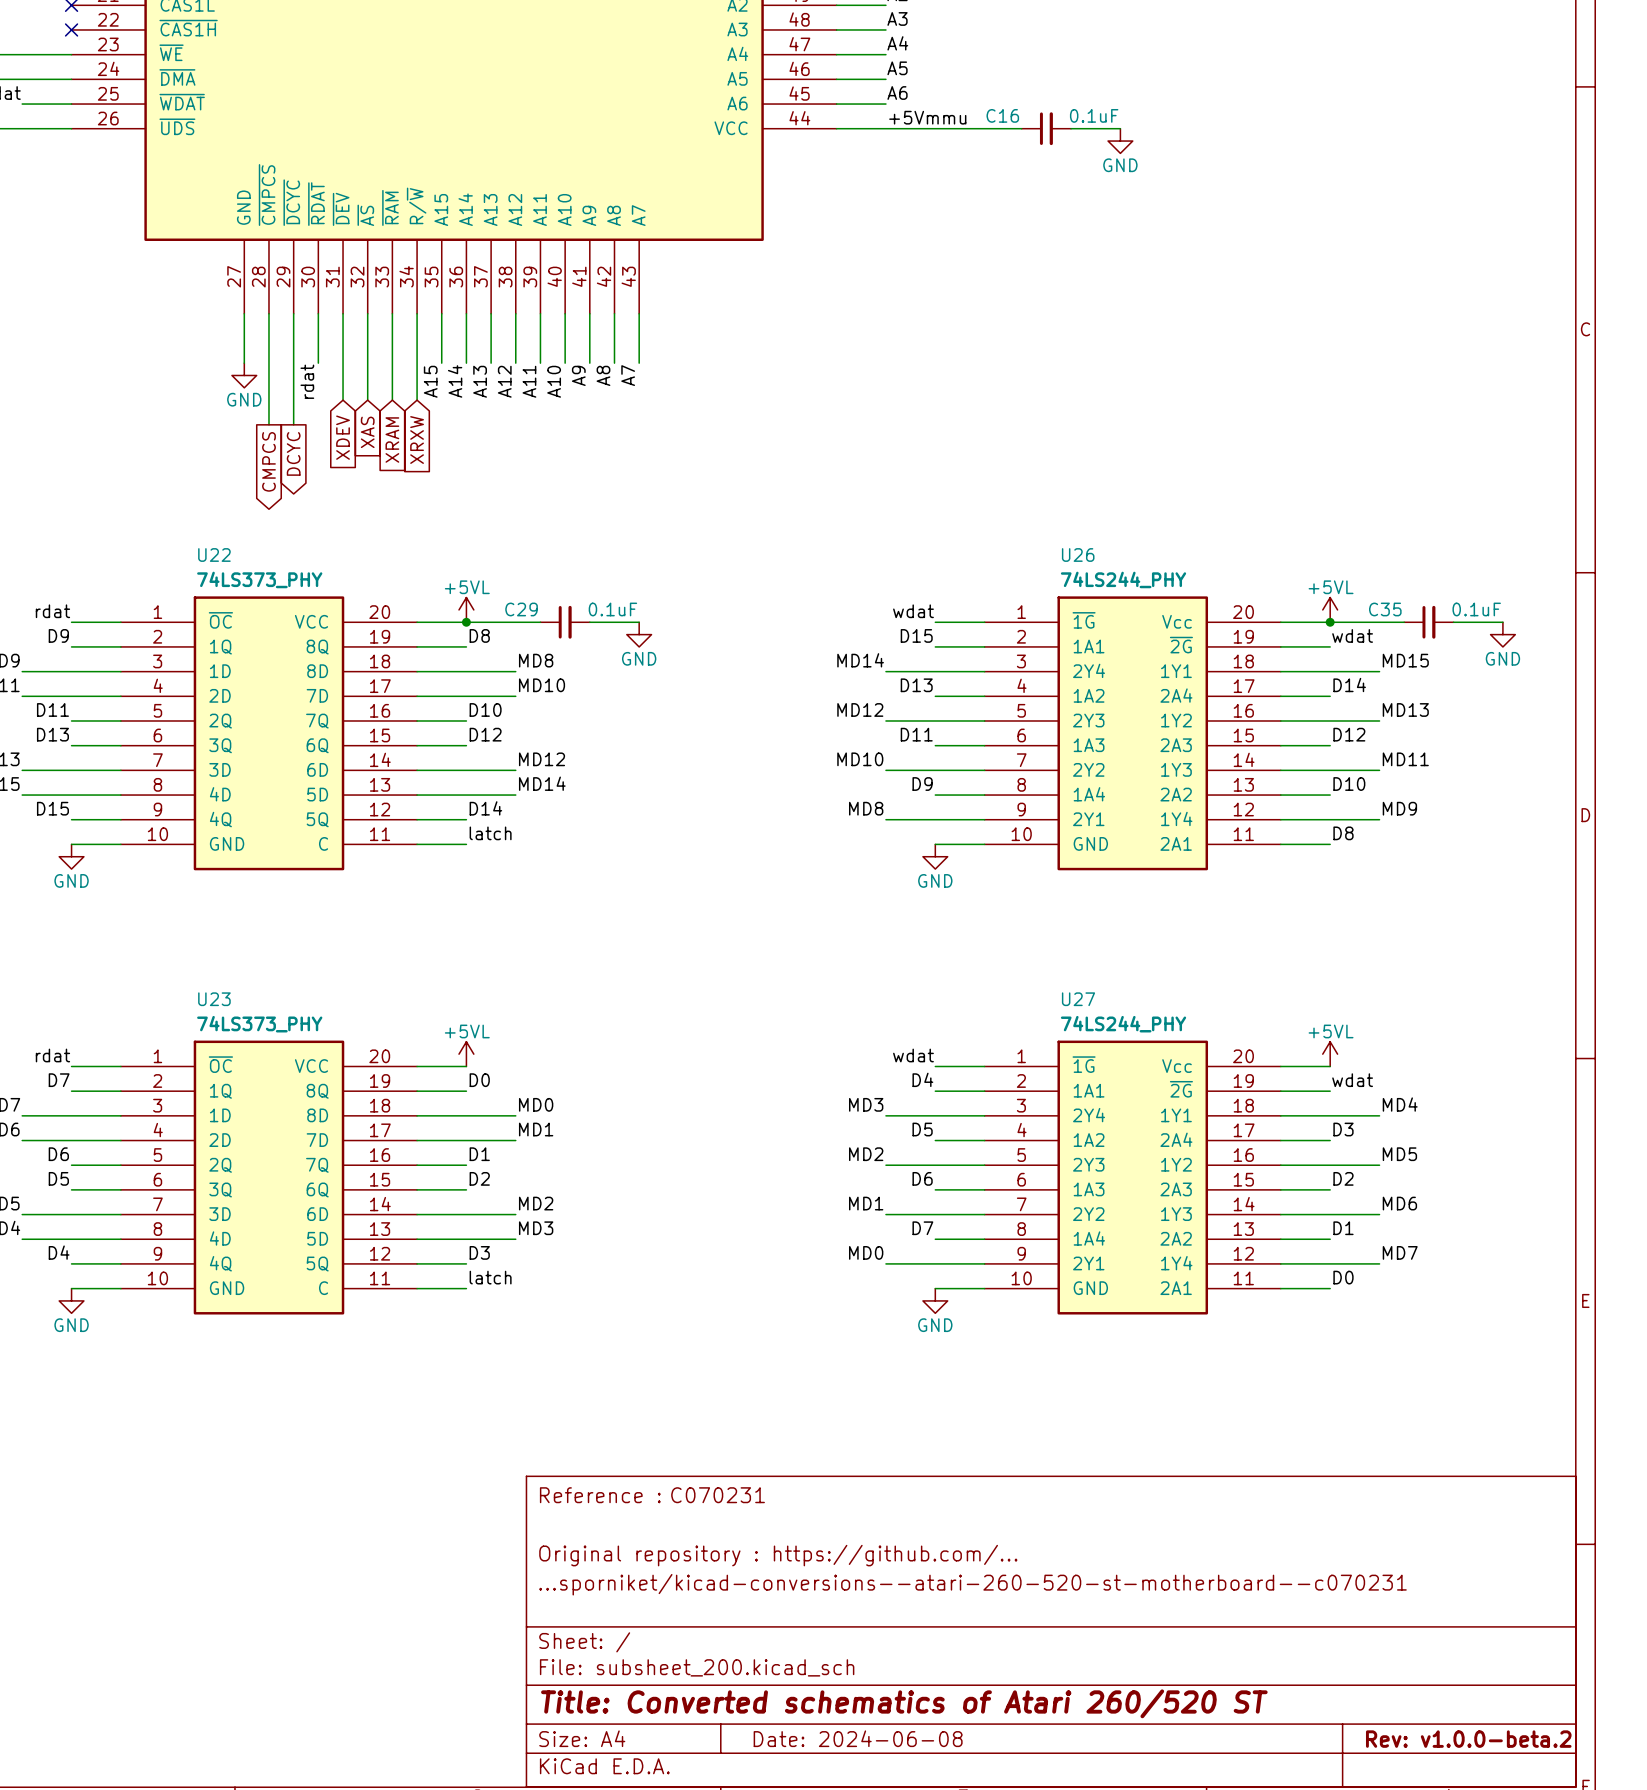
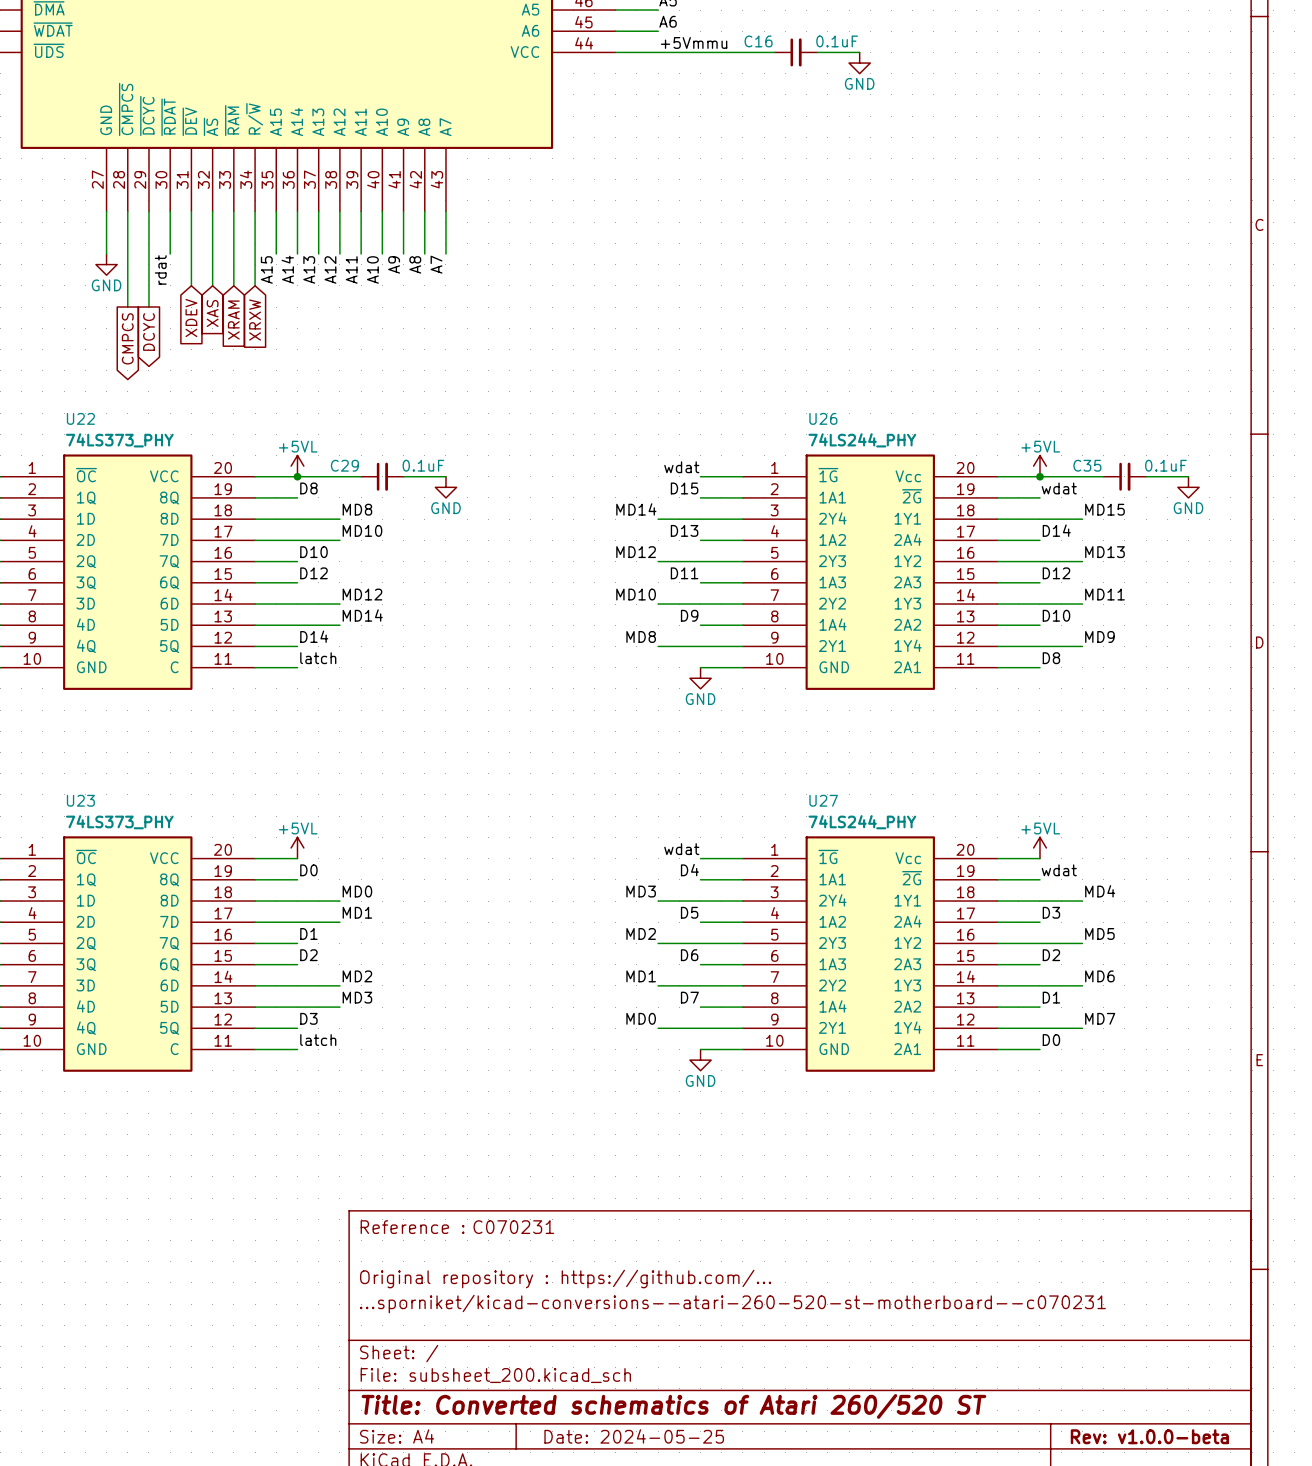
title block: Date: 2024-06-08 (858, 1738) -> Date: 2024-05-25 (634, 1436)
title block: Rev: v1.0.0-beta.2 (1468, 1739) -> Rev: v1.0.0-beta (1149, 1436)

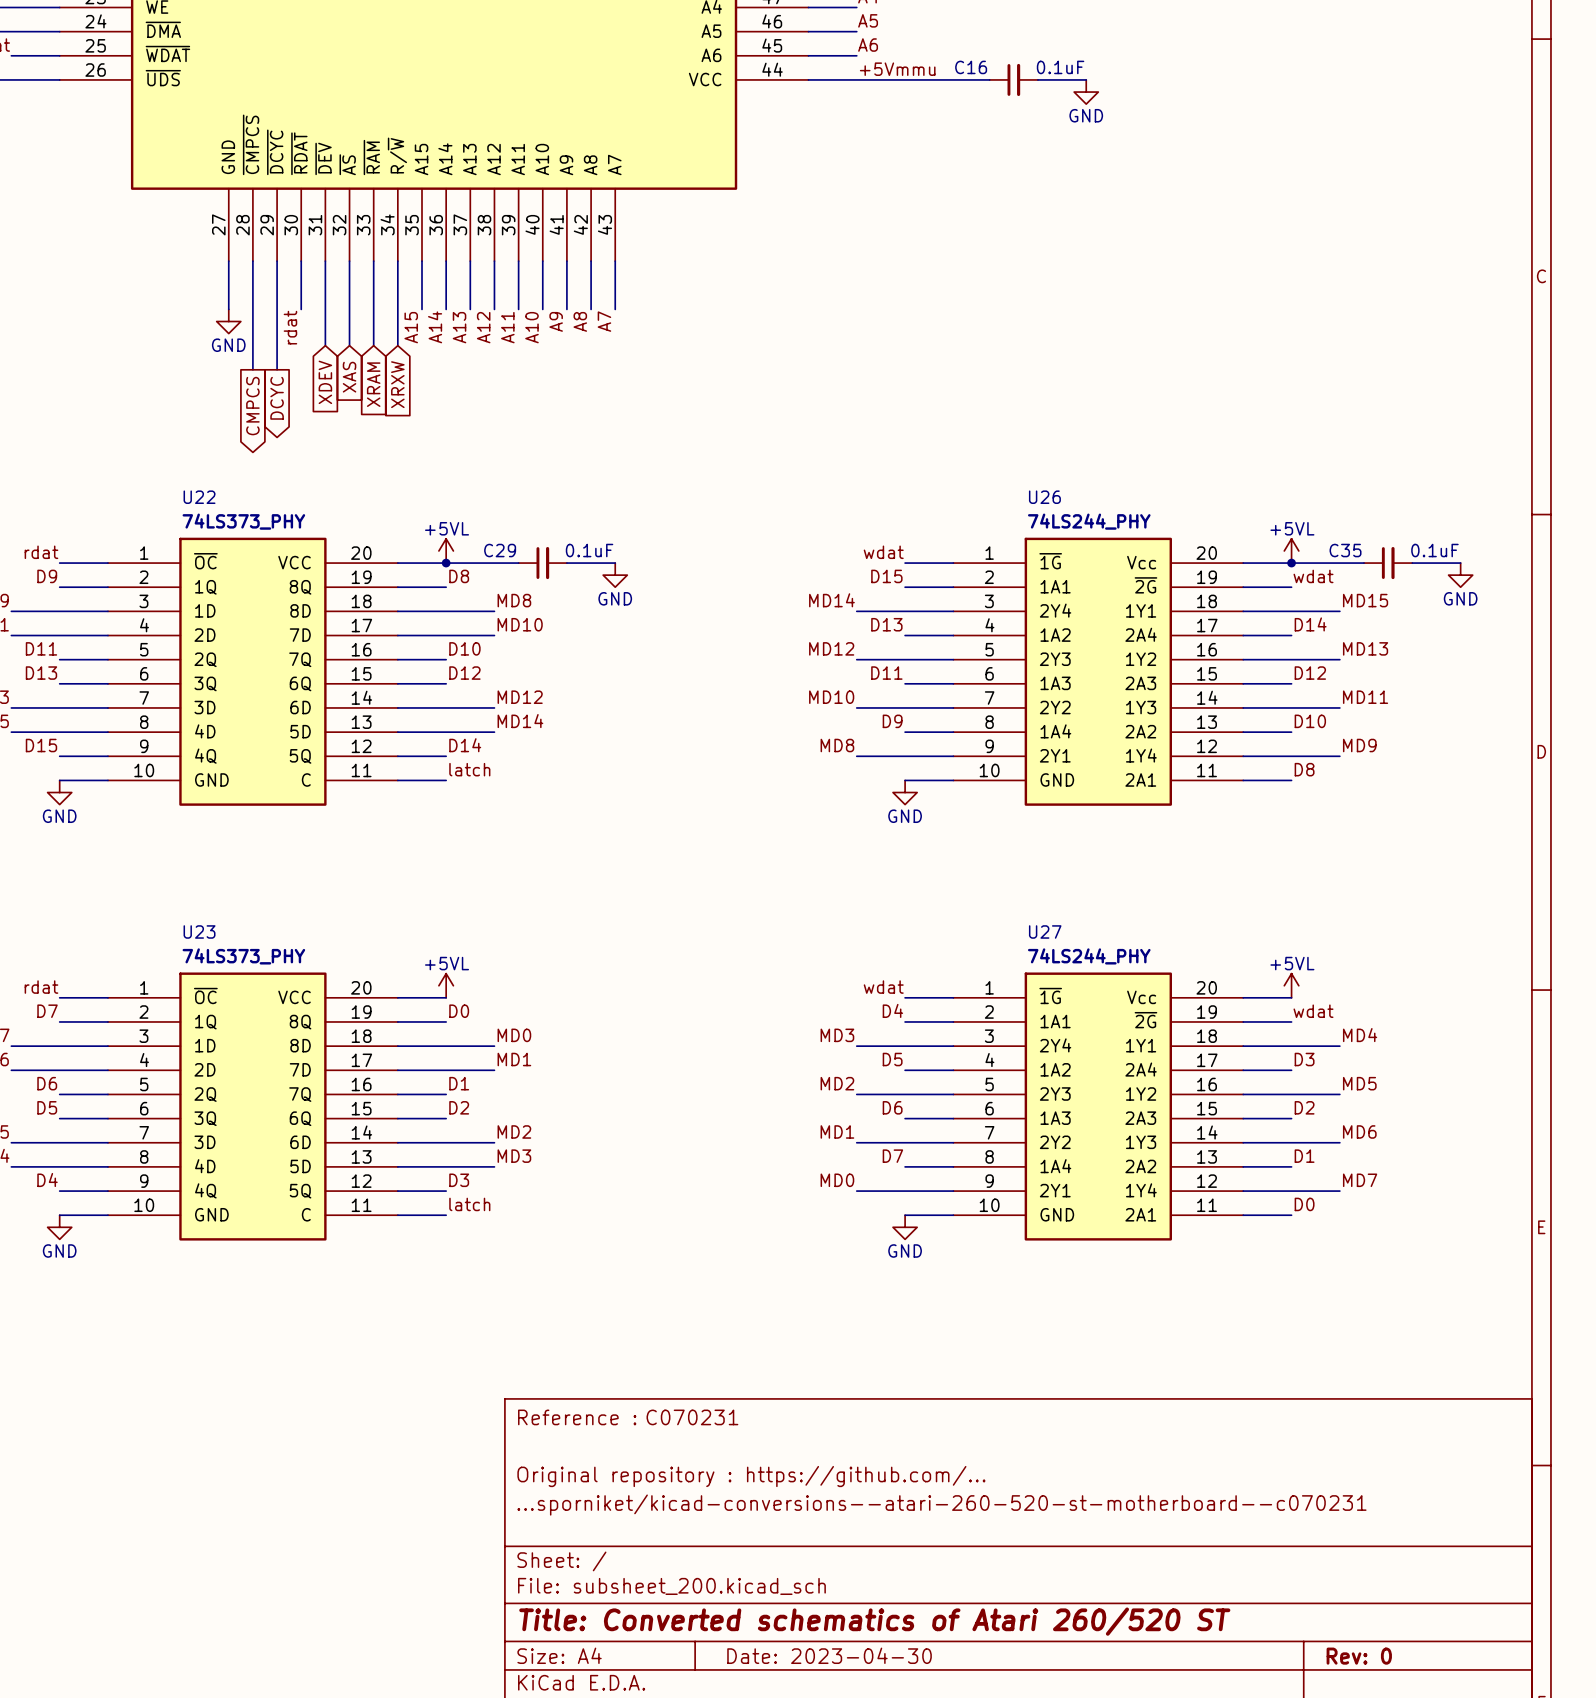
title block: Date: 2024-05-25 (634, 1436) -> Date: 2023-04-30 (829, 1655)
title block: Rev: v1.0.0-beta (1149, 1436) -> Rev: 0 (1359, 1656)

